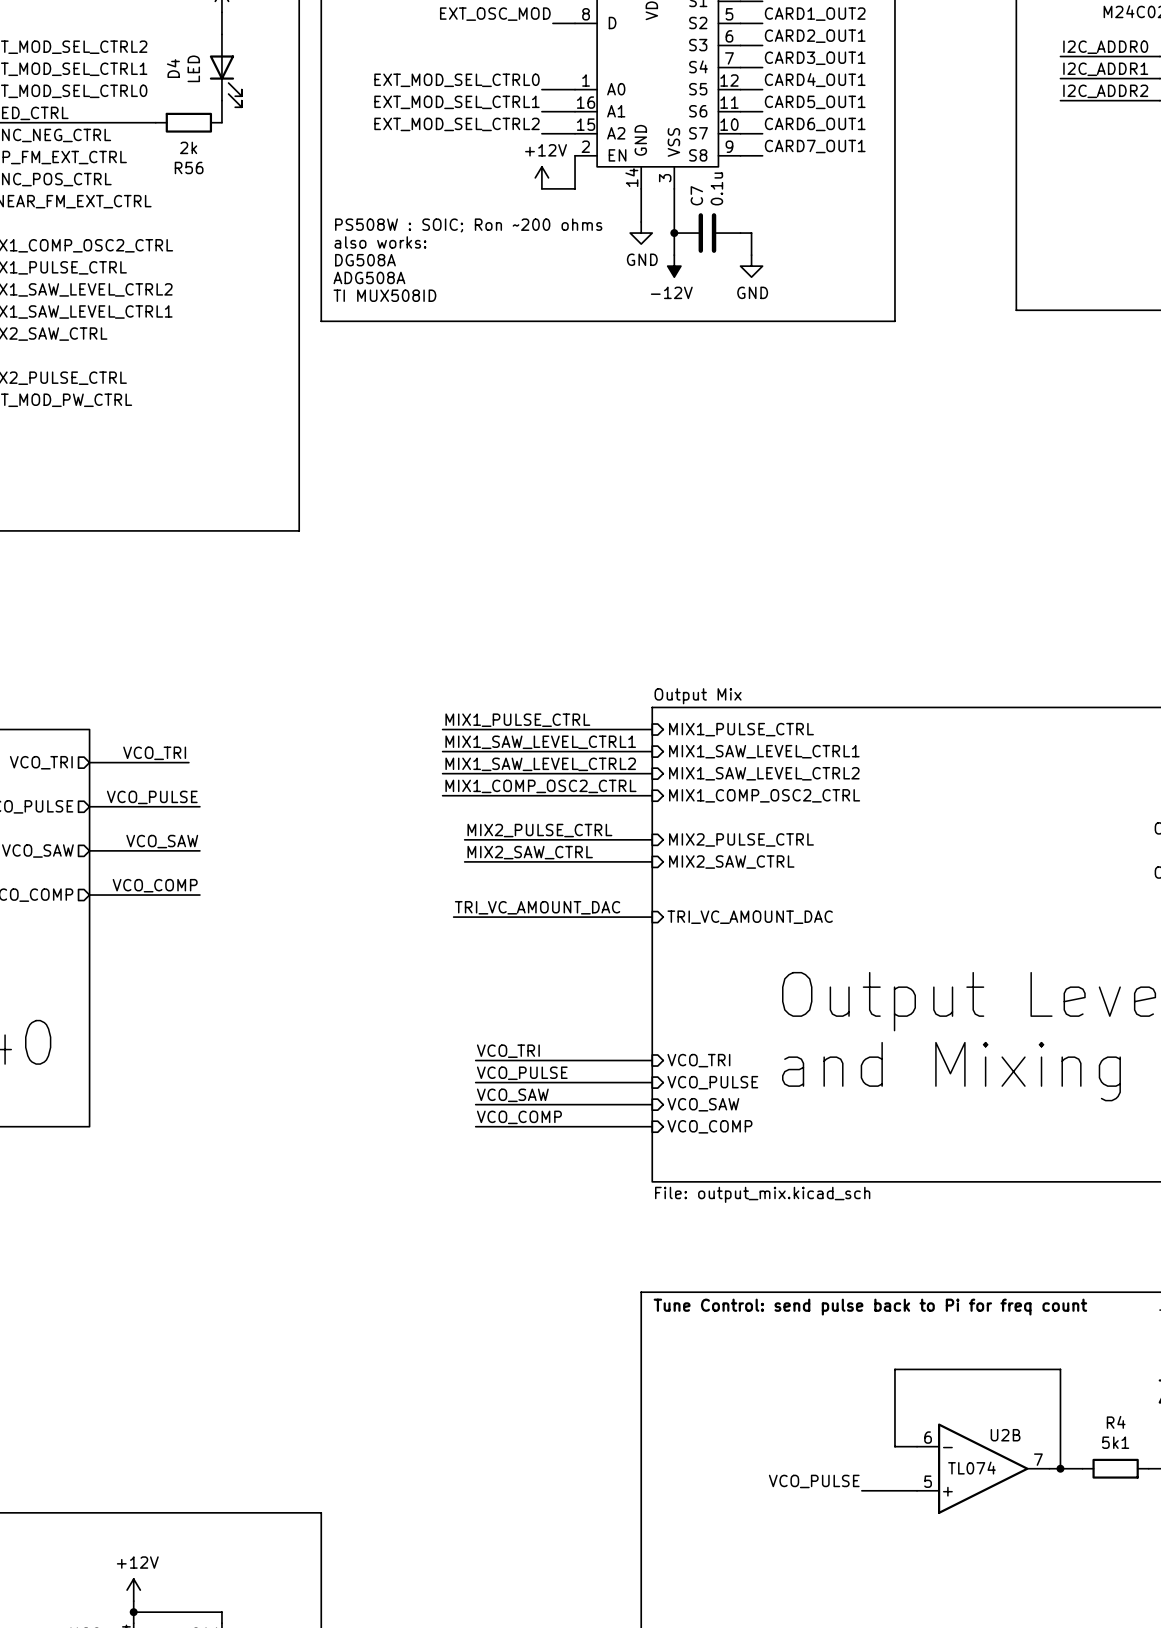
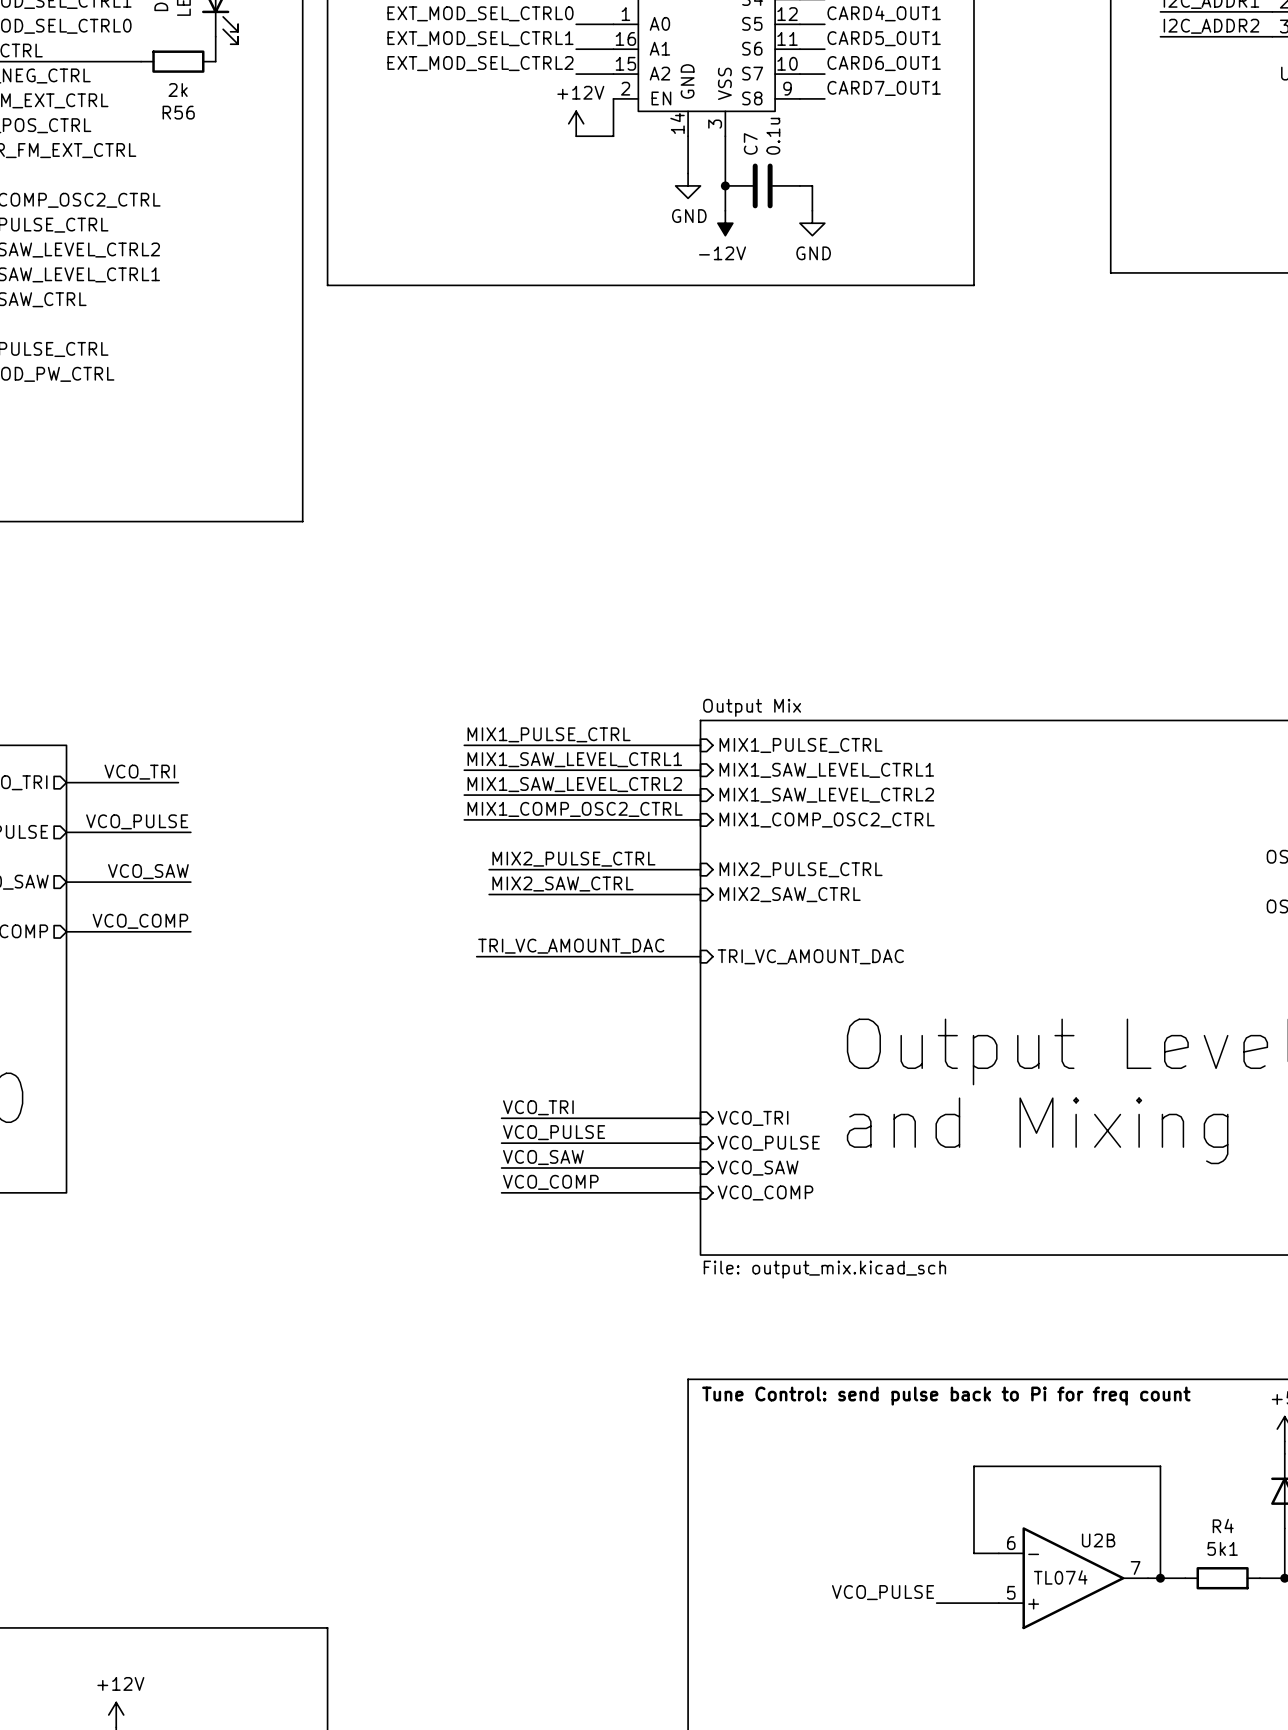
text: PS508W : SOIC; Ron ~200 ohms (468, 225) -> none
text: also works: (380, 242) -> none
text: DG508A (365, 260) -> none
text: ADG508A (369, 277) -> none
text: TI MUX508ID (384, 295) -> none

